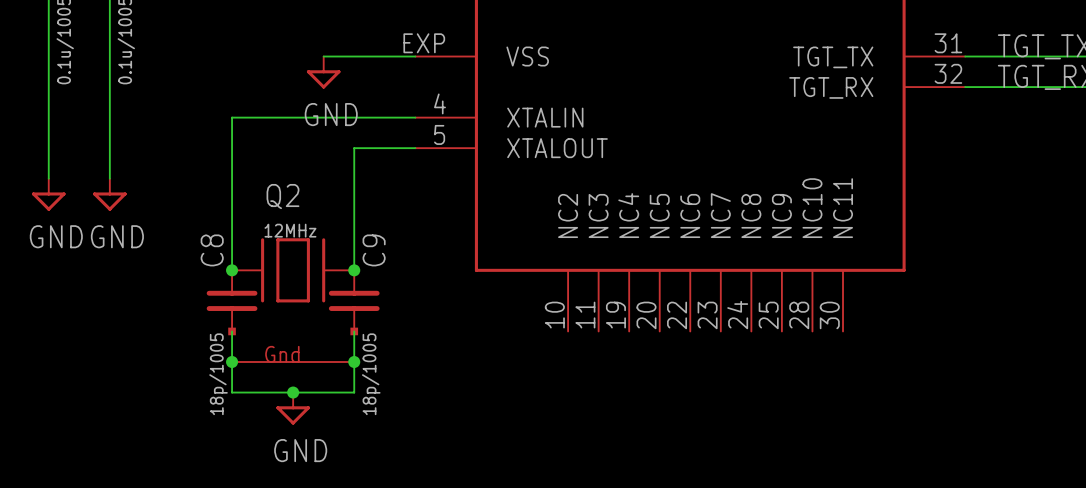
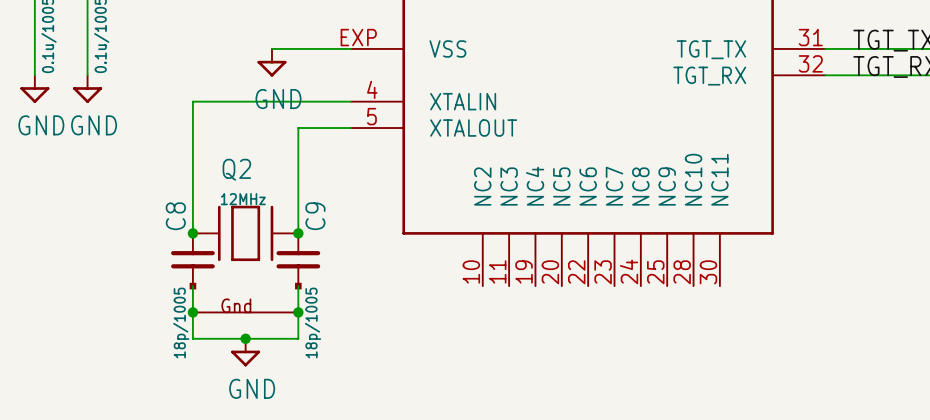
wire: (48, 87) (48, 178) -> none
wire: (109, 87) (109, 178) -> none
power symbol: none -> GND (34, 88)
power symbol: none -> GND (87, 88)
power symbol: GND (48, 194) -> none
power symbol: GND (109, 194) -> none

